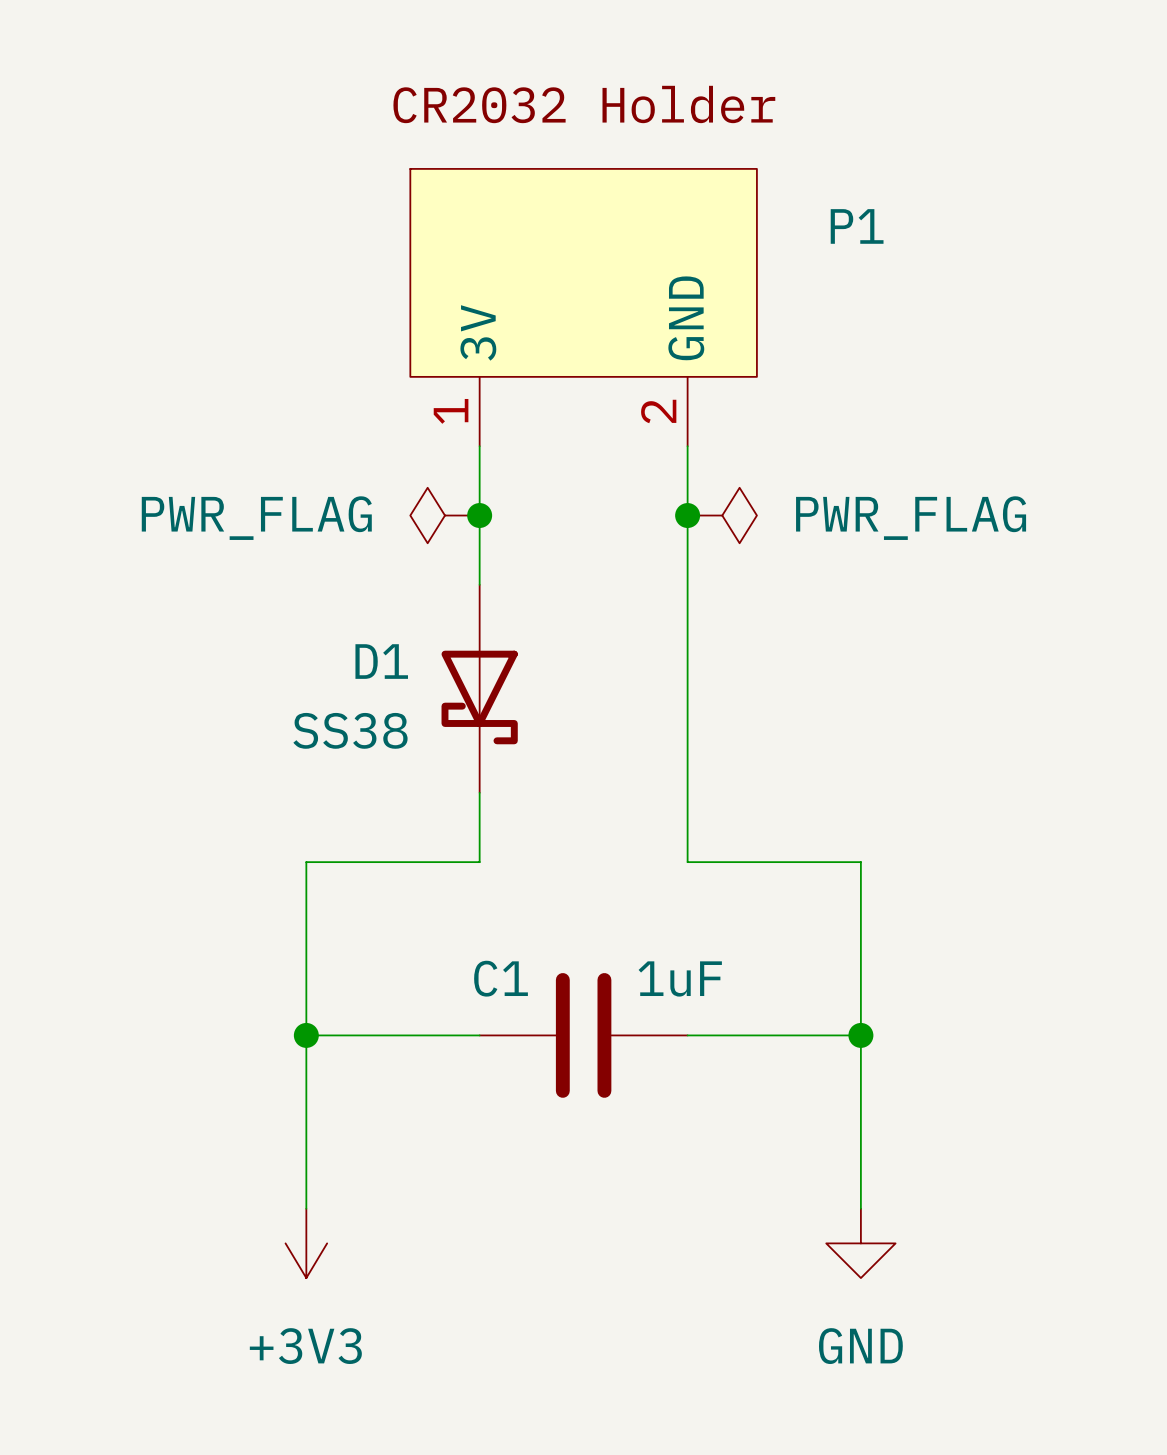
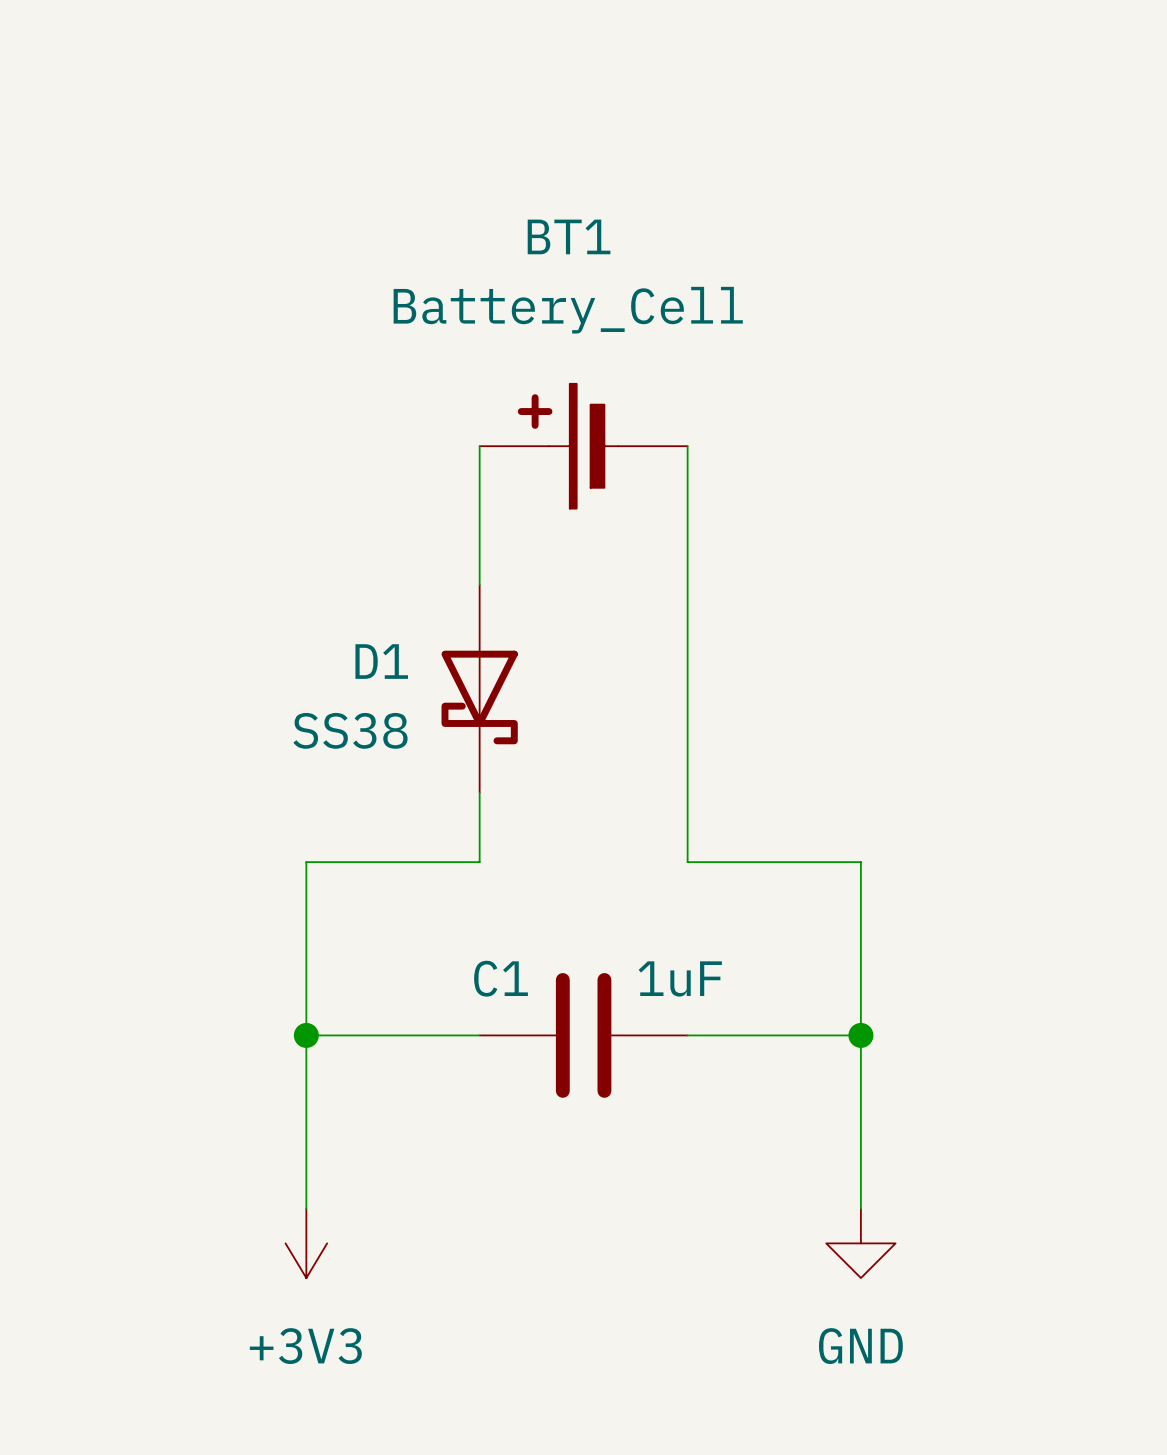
P1: (583, 307) -> none
BT1: none -> Battery_Cell (583, 446)
power symbol: PWR_FLAG (444, 515) -> none
junction: (479, 515) -> none
junction: (687, 515) -> none
power symbol: PWR_FLAG (722, 515) -> none

